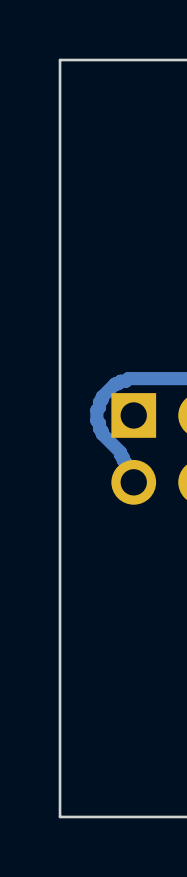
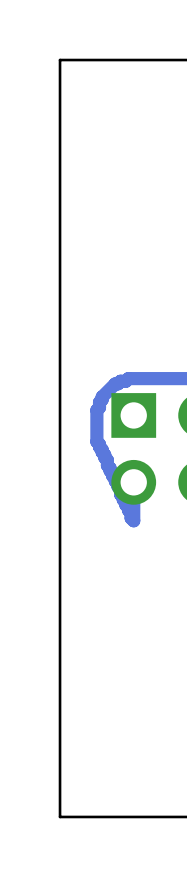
track: (96, 420) (102, 433) (120, 452) (133, 482) -> (96, 420) (96, 441) (107, 460) (107, 465) (120, 489) (120, 494) (133, 520) (133, 482)

